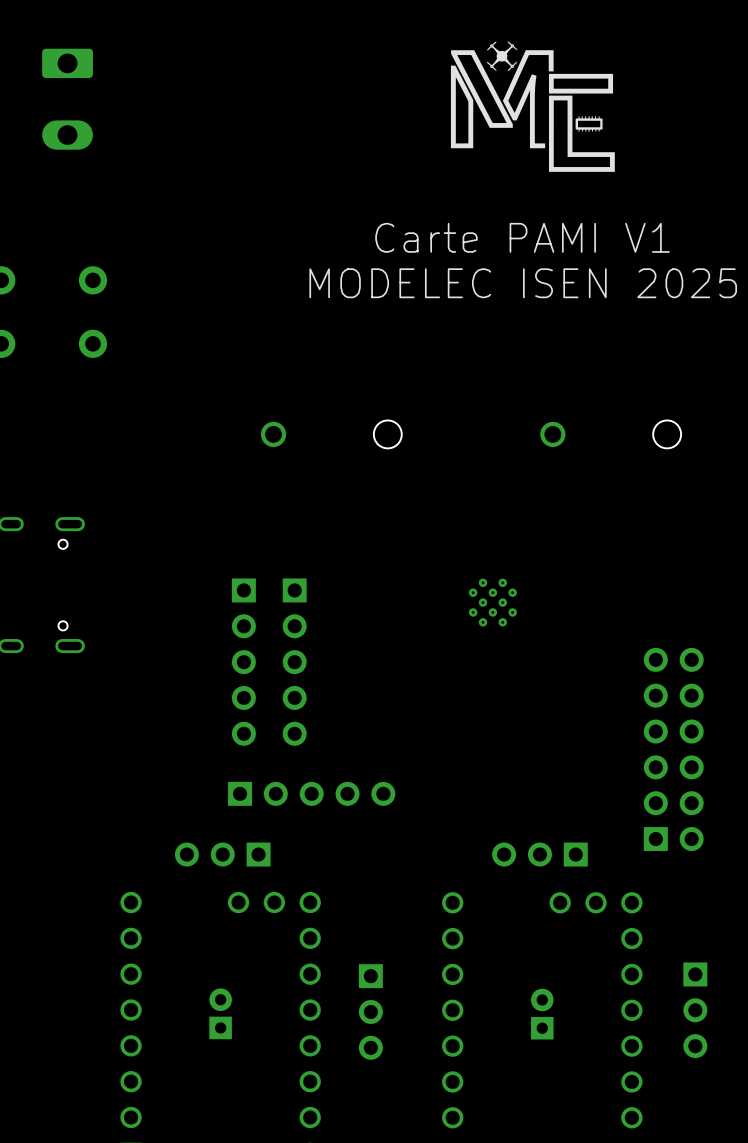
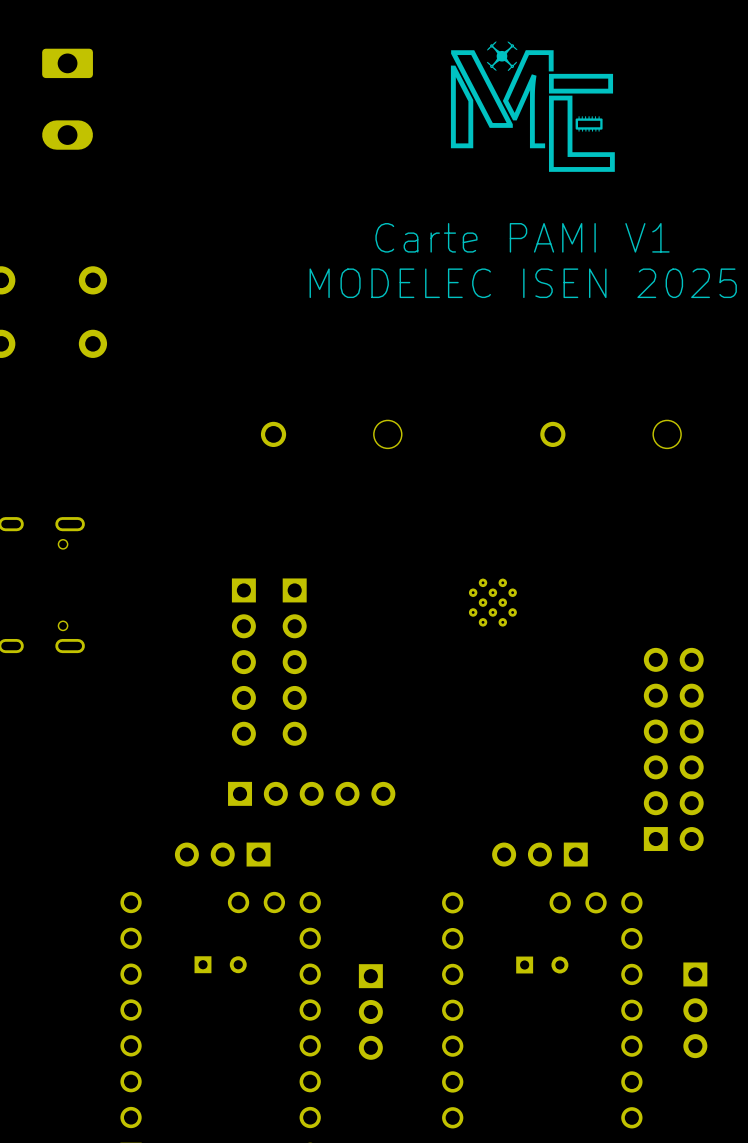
part: none -> (220, 964)
part: none -> (542, 965)
part: (220, 1013) -> none
part: (542, 1014) -> none

